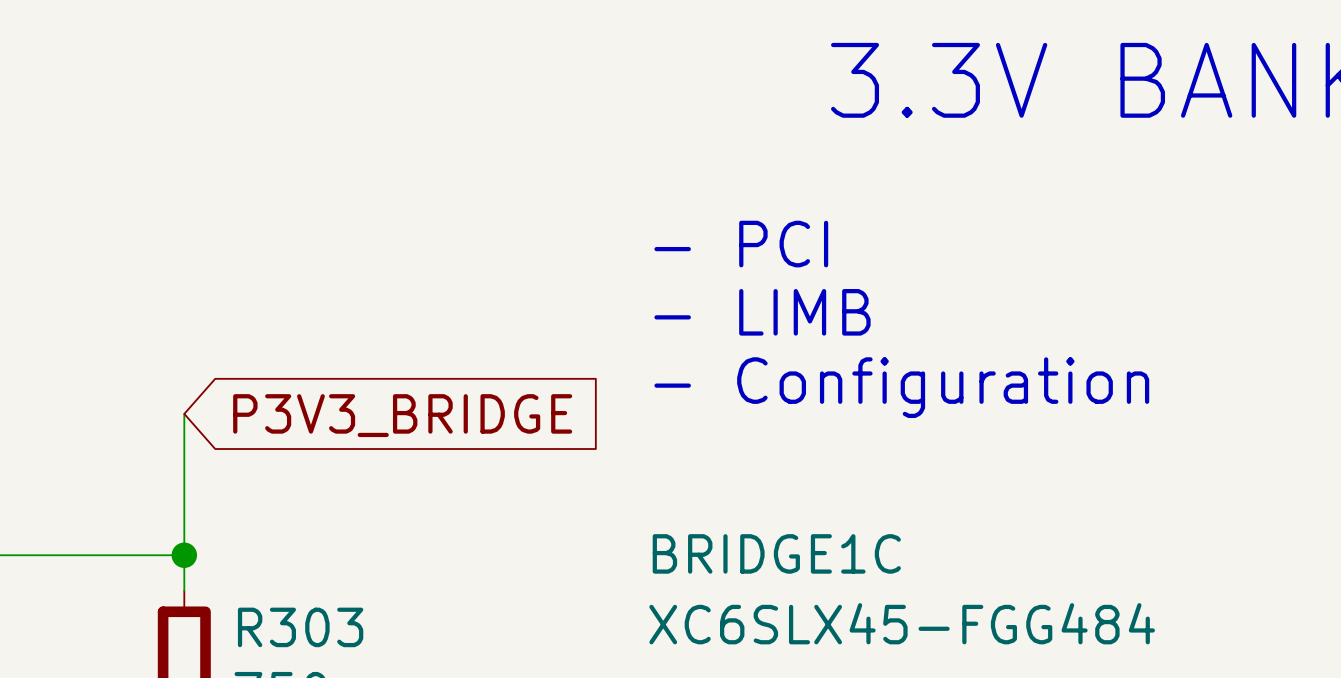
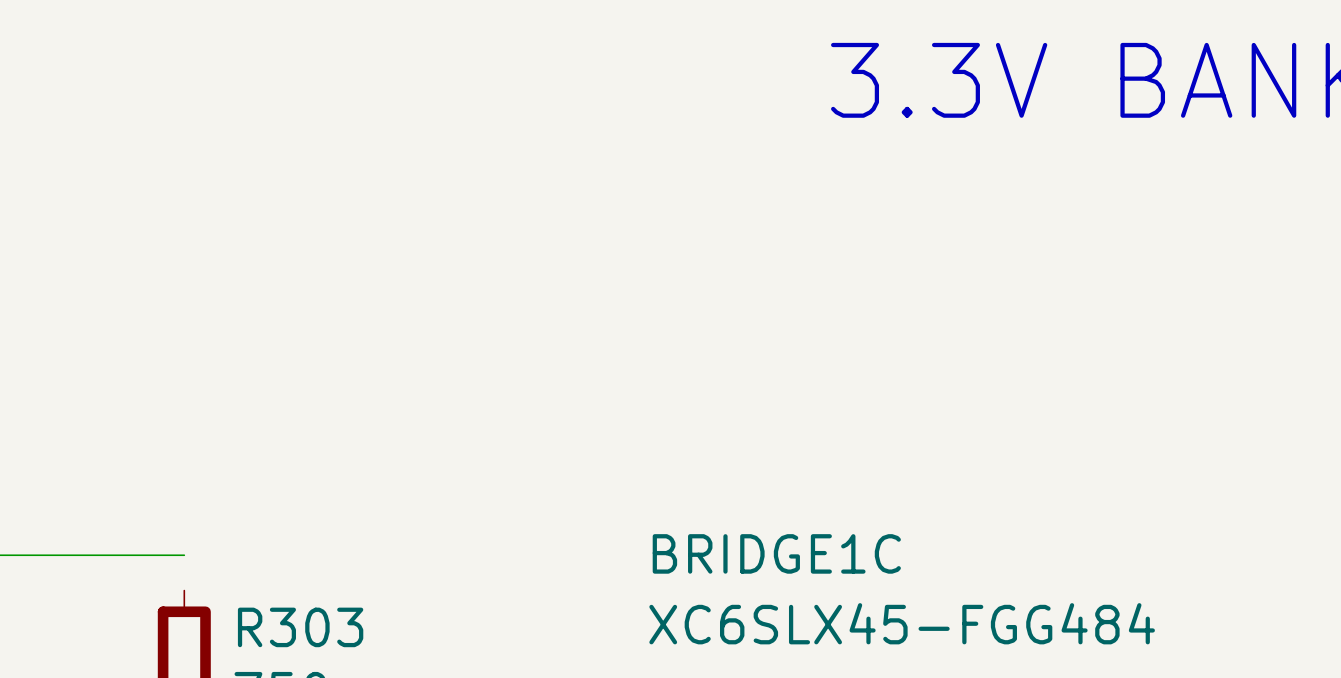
text: - PCI (741, 244) -> none
text: - LIMB (762, 312) -> none
text: - Configuration (901, 387) -> none
wire: (184, 413) (184, 590) -> none
global label: P3V3_BRIDGE (402, 415) -> none
junction: (184, 555) -> none

